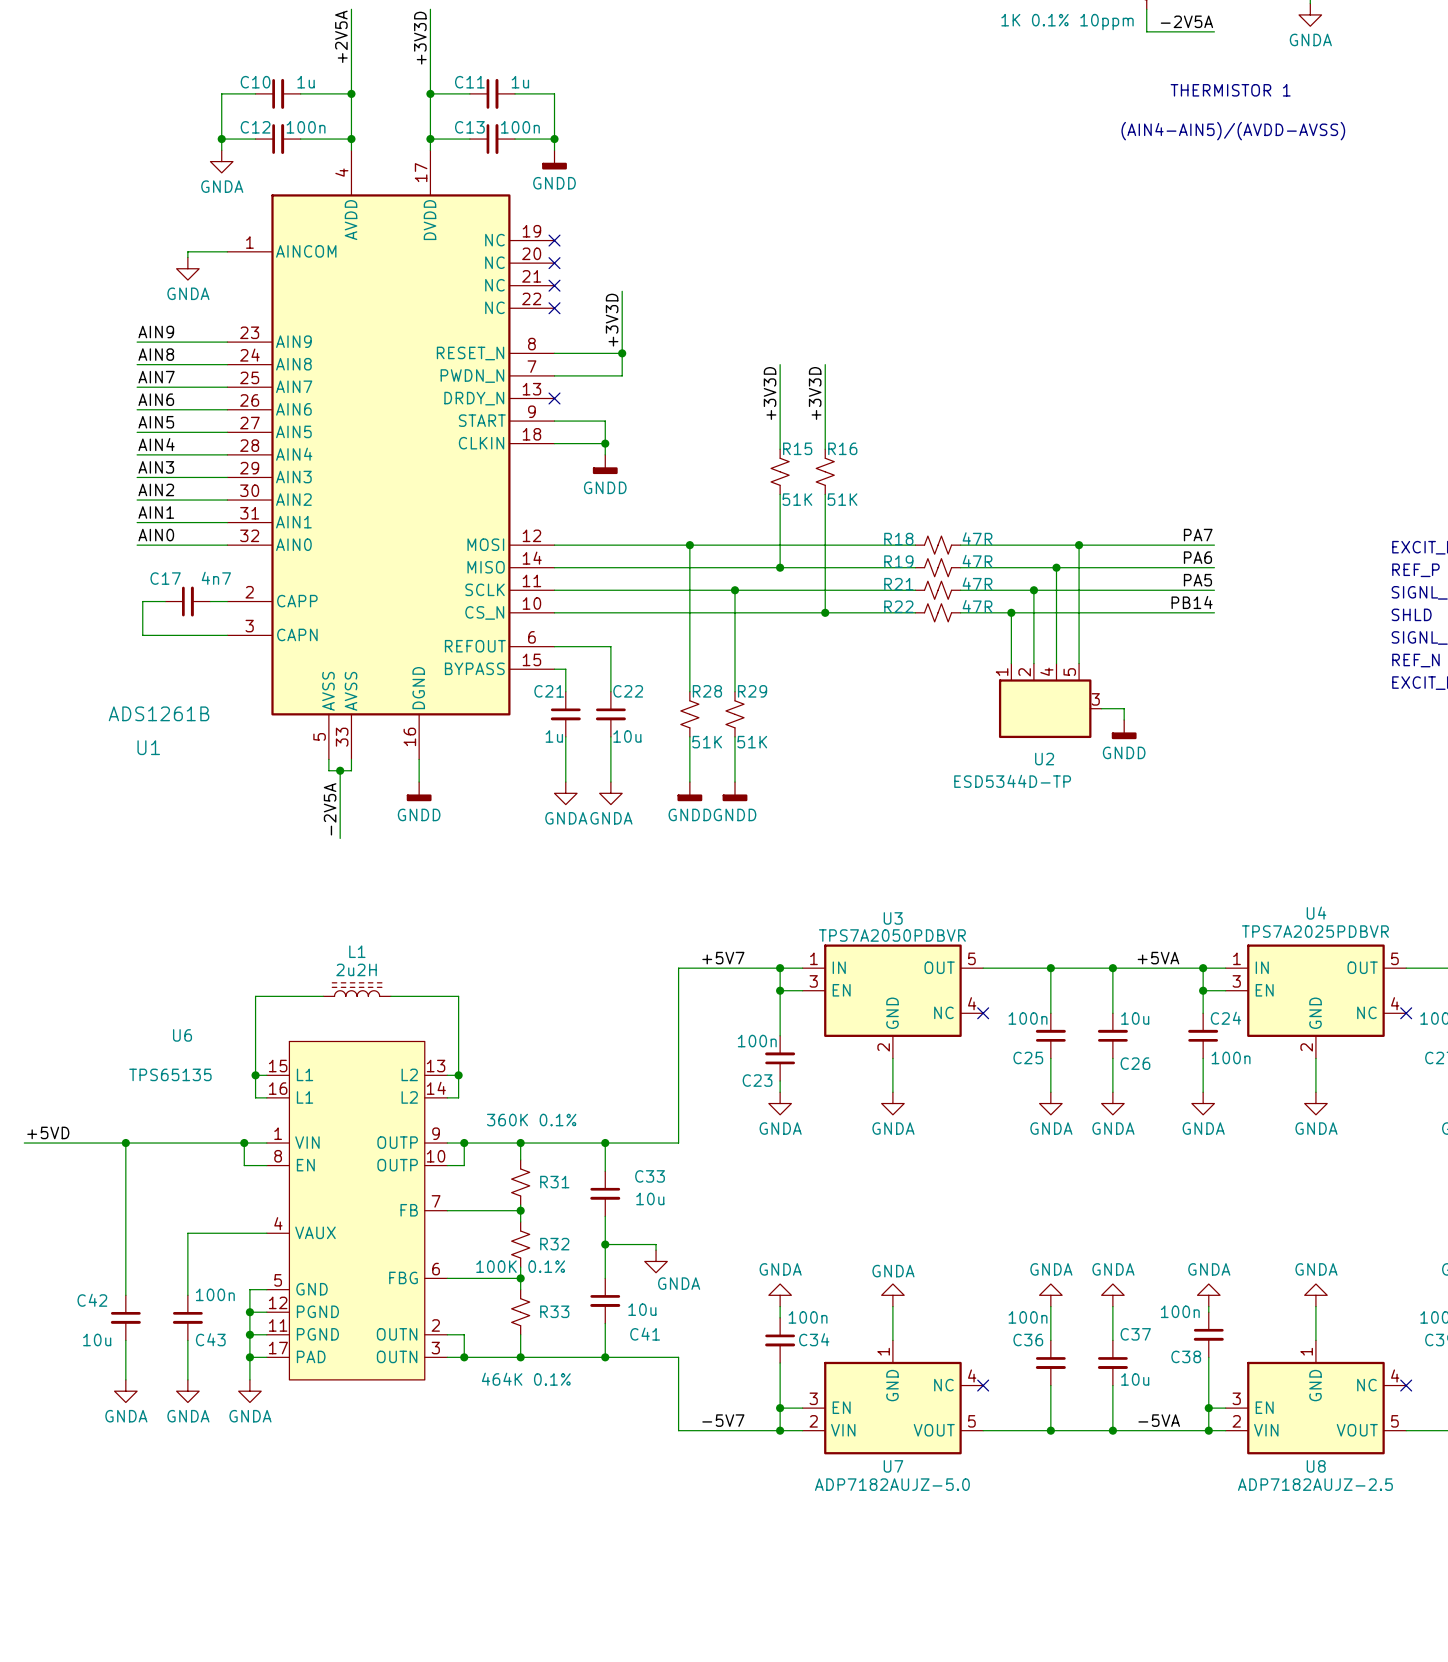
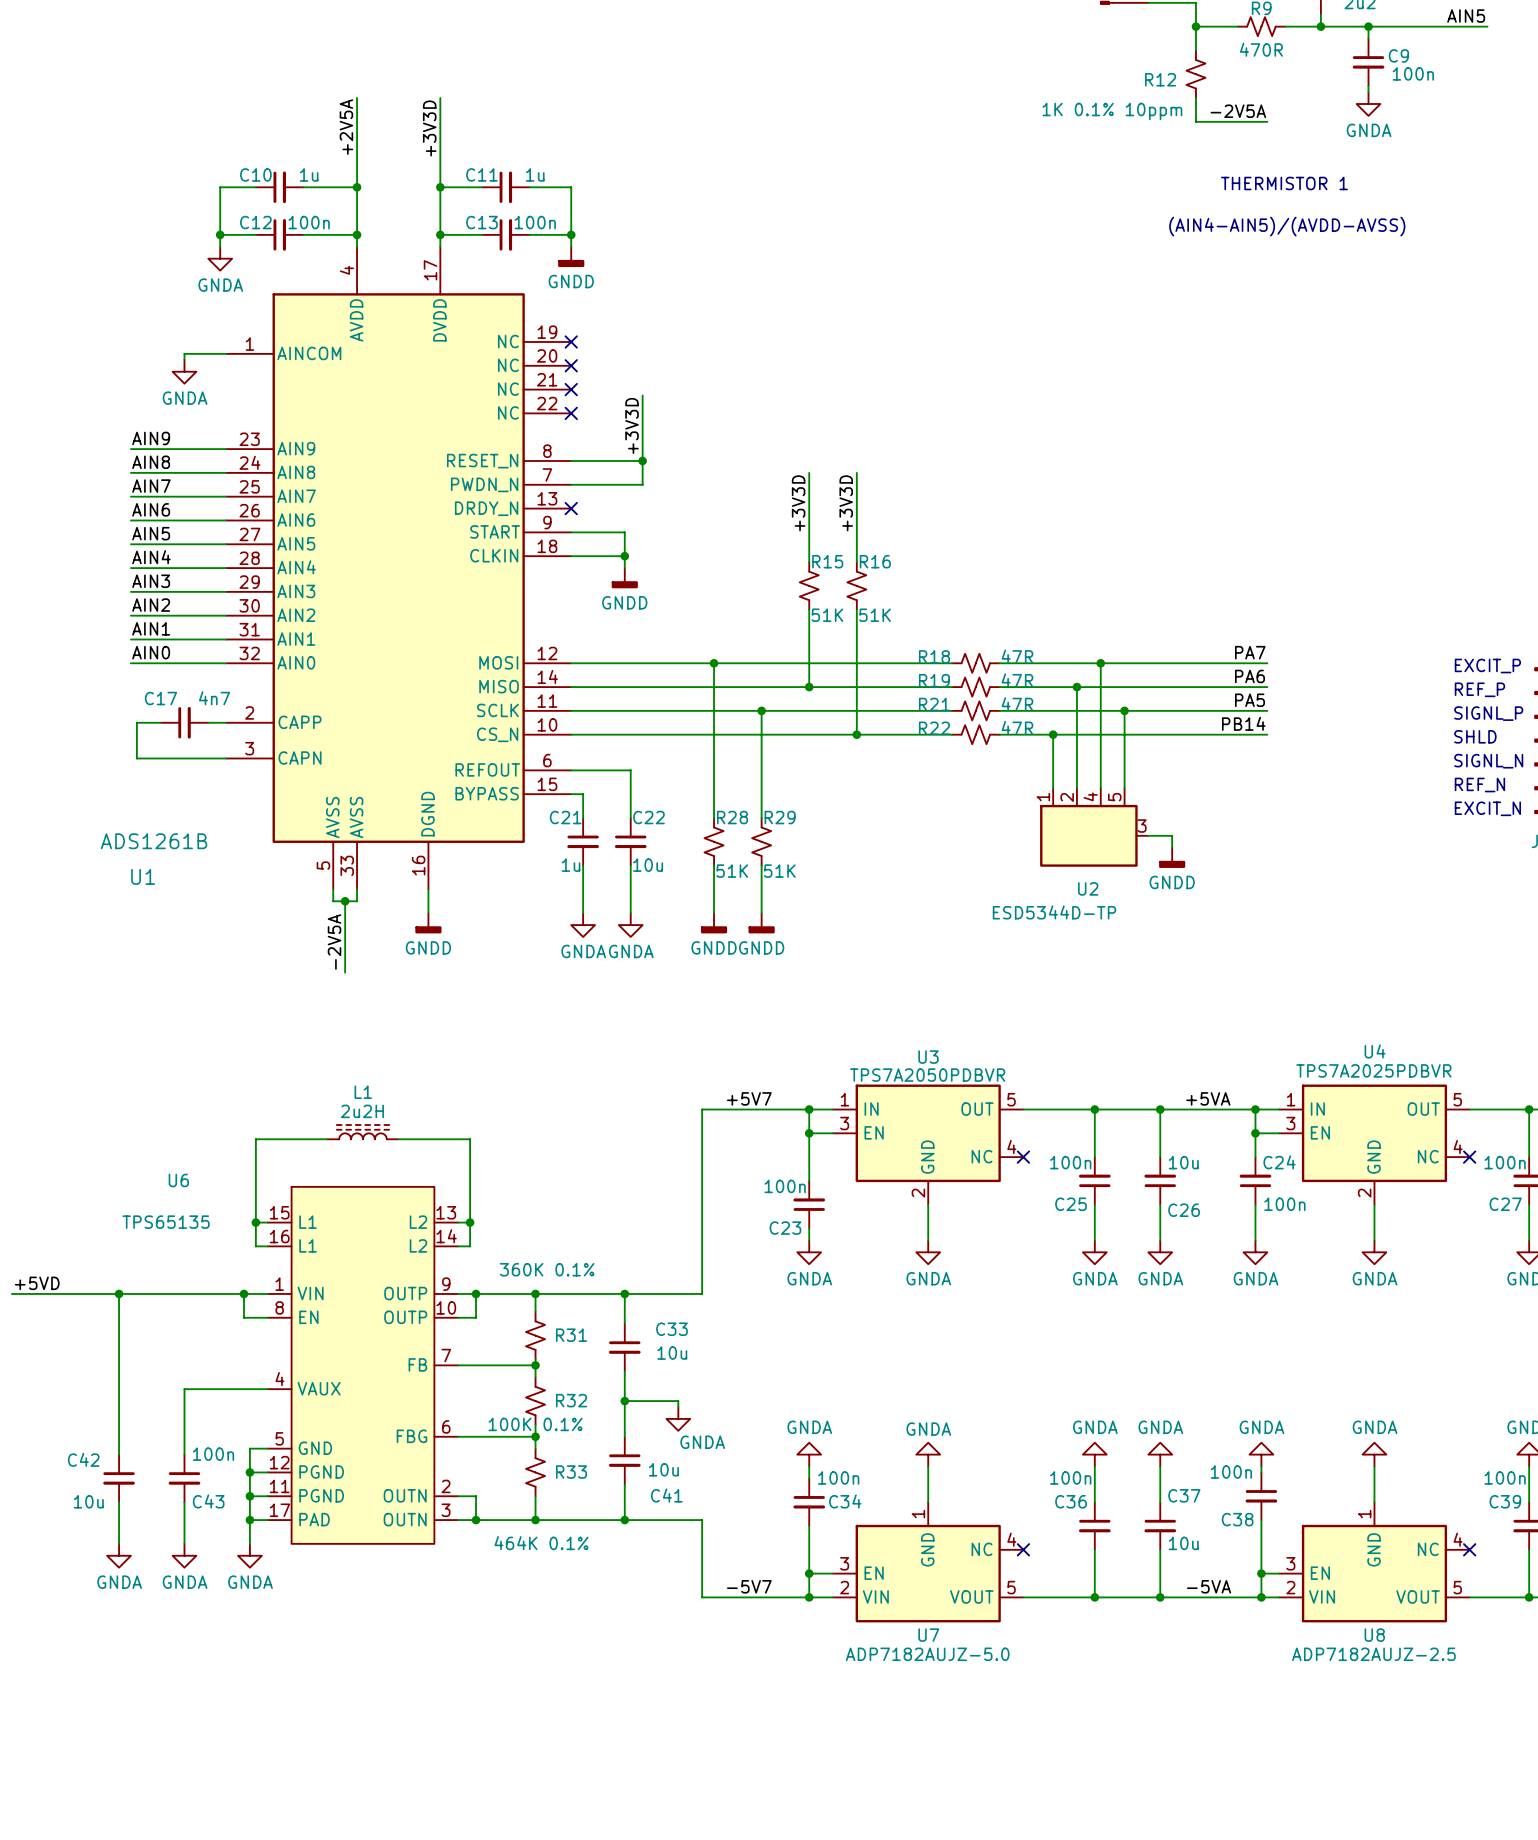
wire: none -> (1100, 663) (1100, 687)
junction: none -> (1100, 663)
wire: (1079, 545) (1079, 590) -> none
junction: (1079, 545) -> none
wire: none -> (1076, 687) (1076, 710)
junction: none -> (1076, 687)
junction: (1056, 567) -> none
junction: (1033, 590) -> none
junction: none -> (1124, 710)

